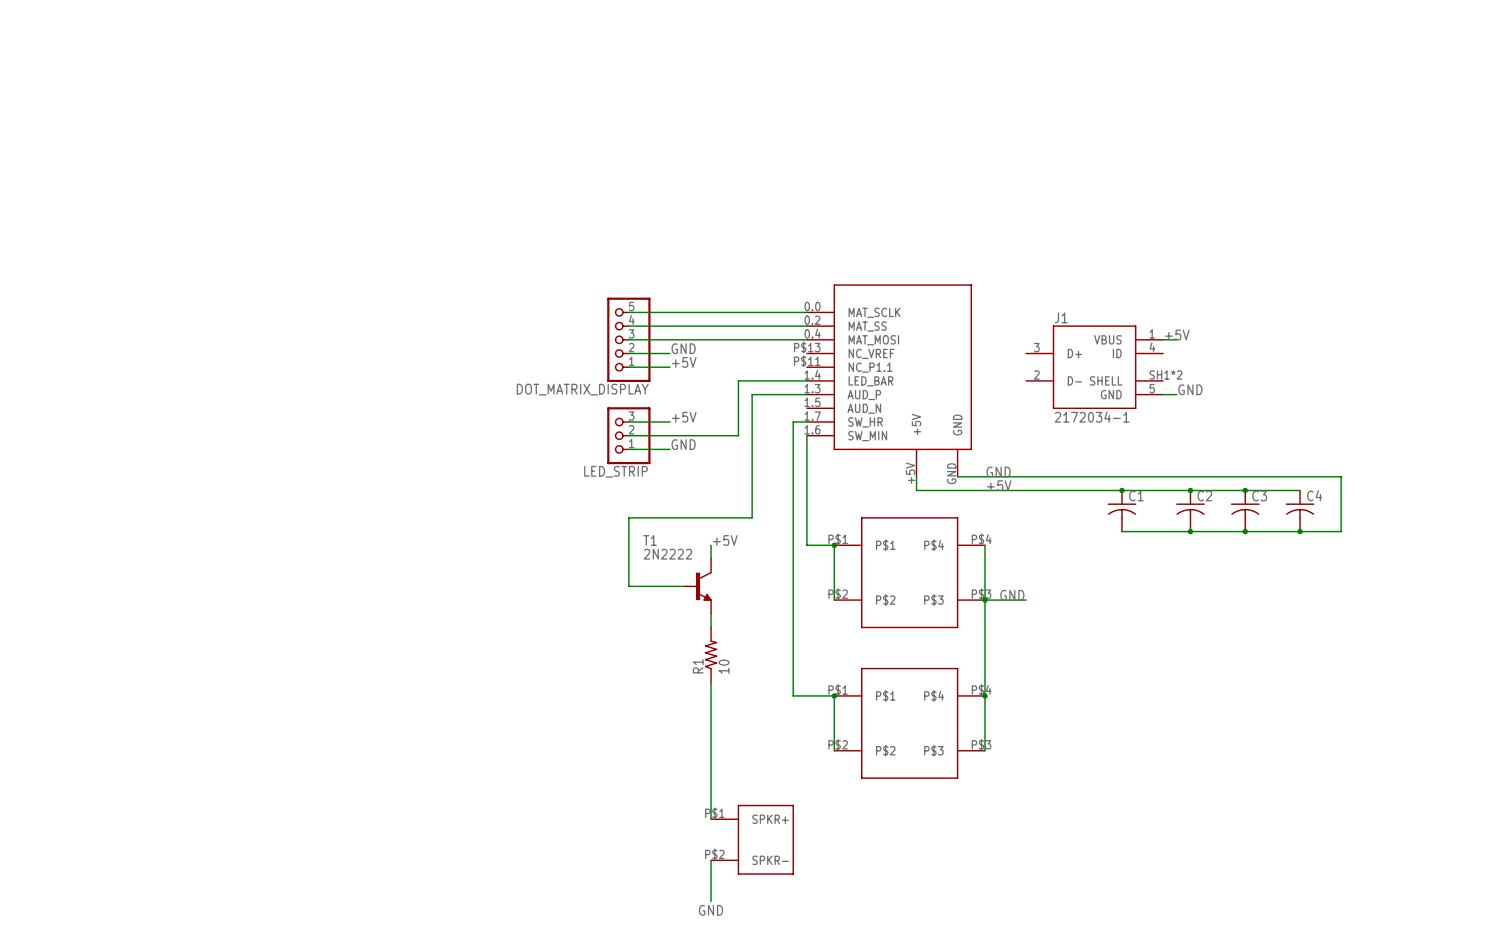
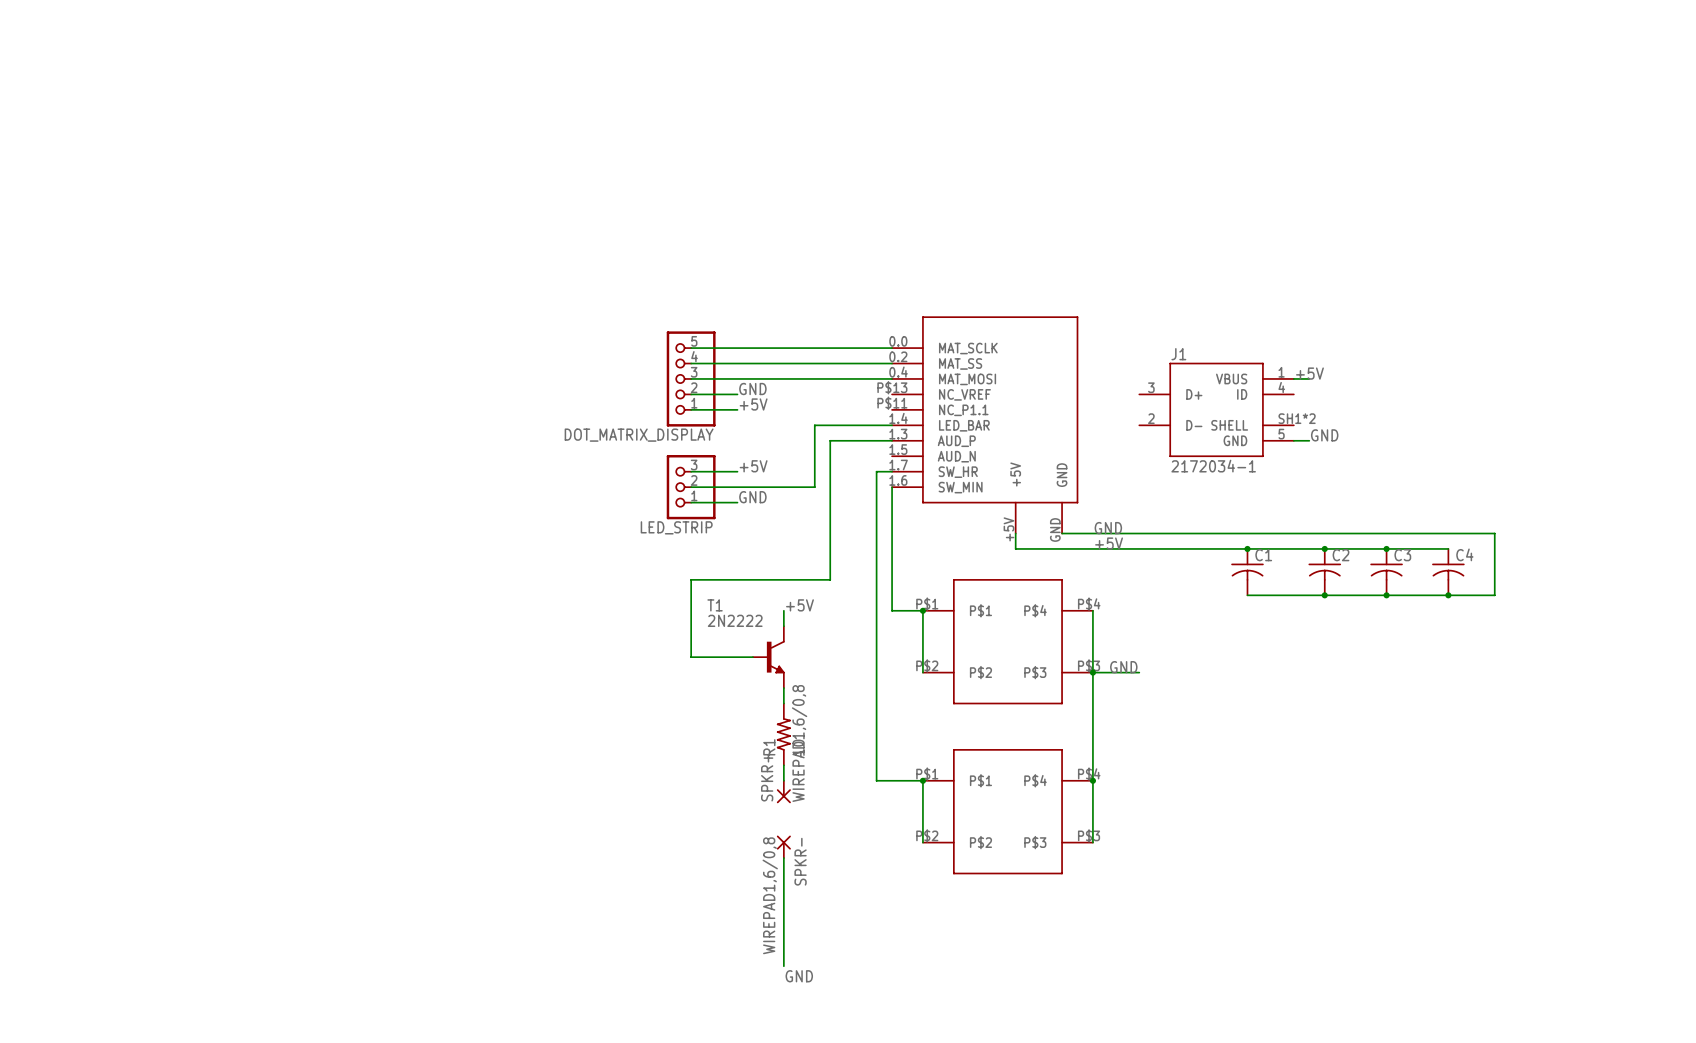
wire: (711, 695) (711, 764) -> none
SPKR+: none -> WIREPAD1,6/0,8 (783, 791)
SPKR-: none -> WIREPAD1,6/0,8 (783, 846)
part: (752, 839) -> none
wire: (711, 860) (711, 901) -> (783, 966) (783, 919)
label position: GND (711, 910) -> GND (799, 976)

